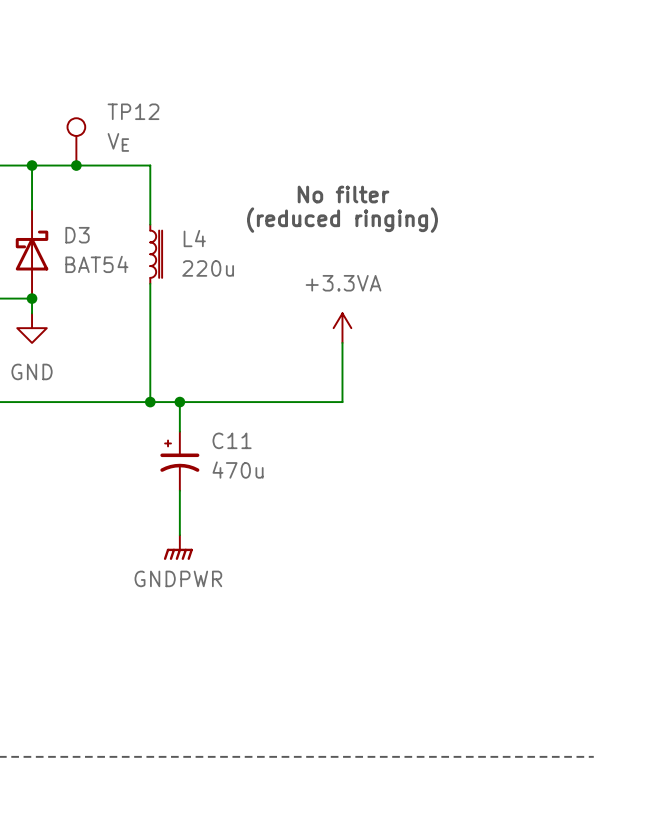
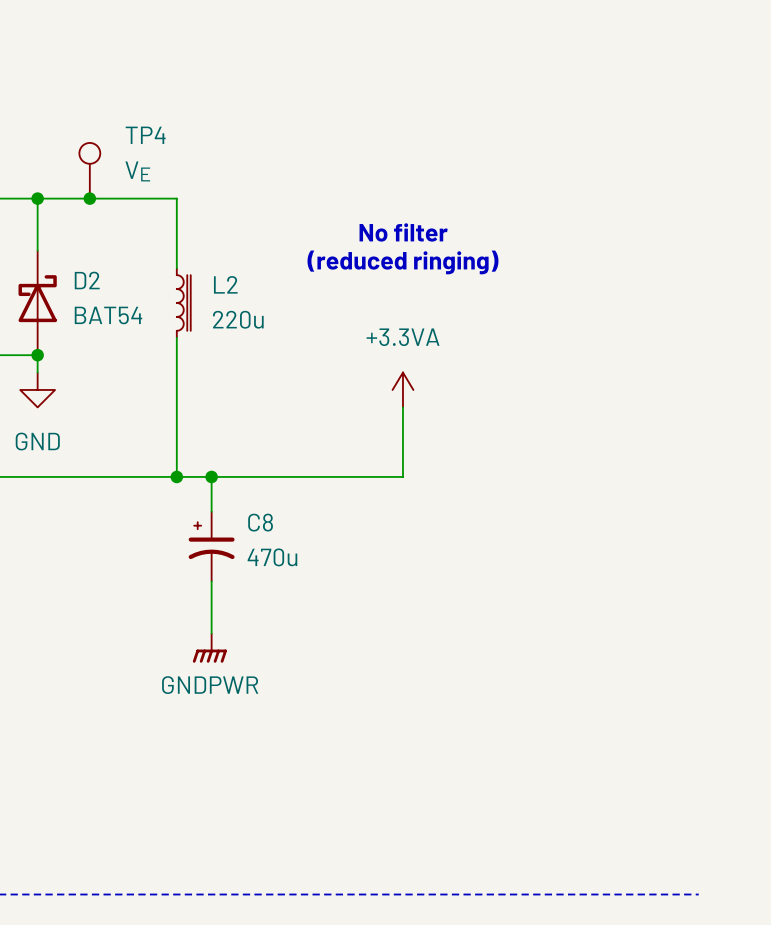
TP12 name: TP12 (133, 111) -> TP4 (145, 135)
D3 name: D3 (77, 235) -> D2 (87, 280)
L4 name: L4 (194, 238) -> L2 (225, 284)
C11 name: C11 (232, 440) -> C8 (260, 522)

